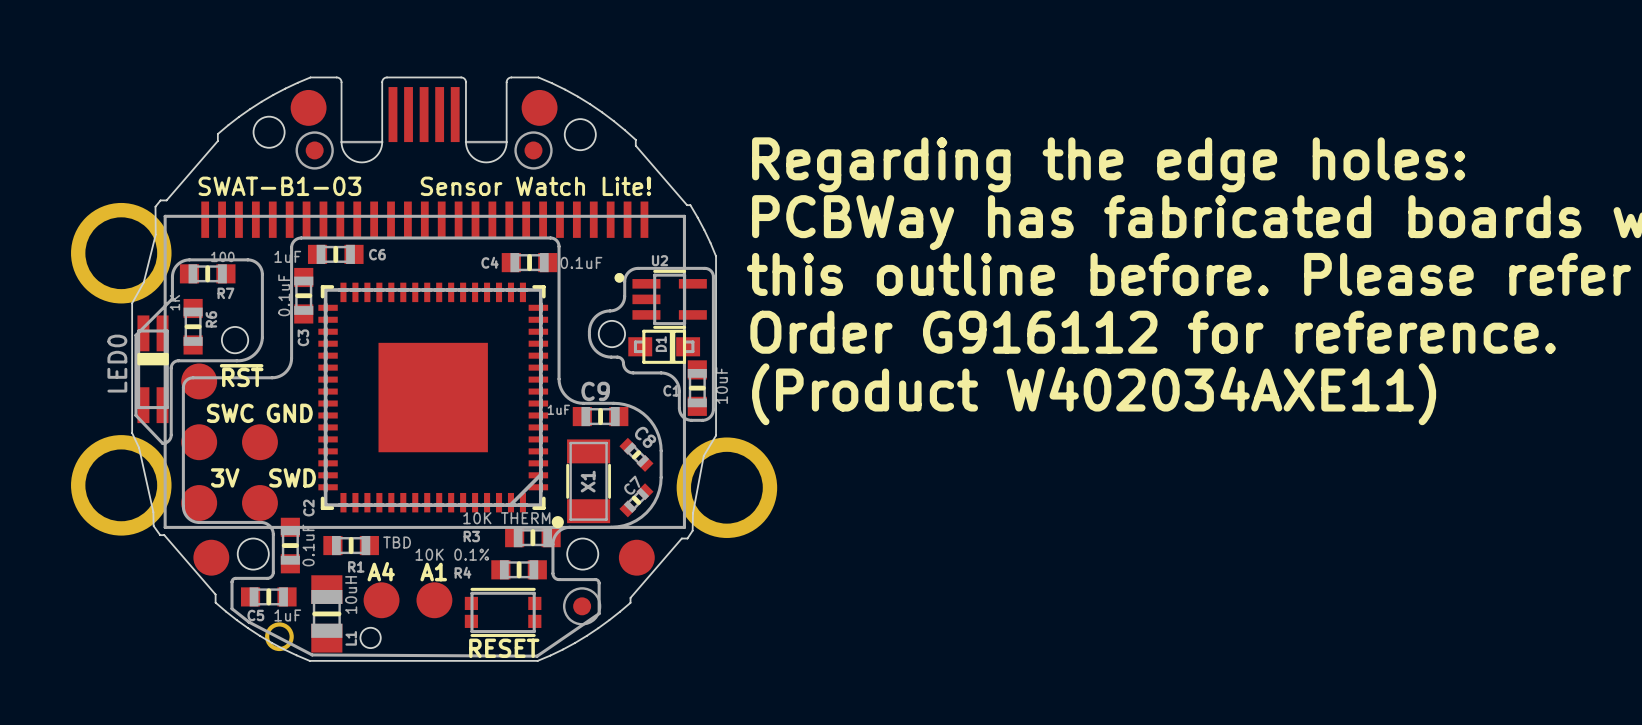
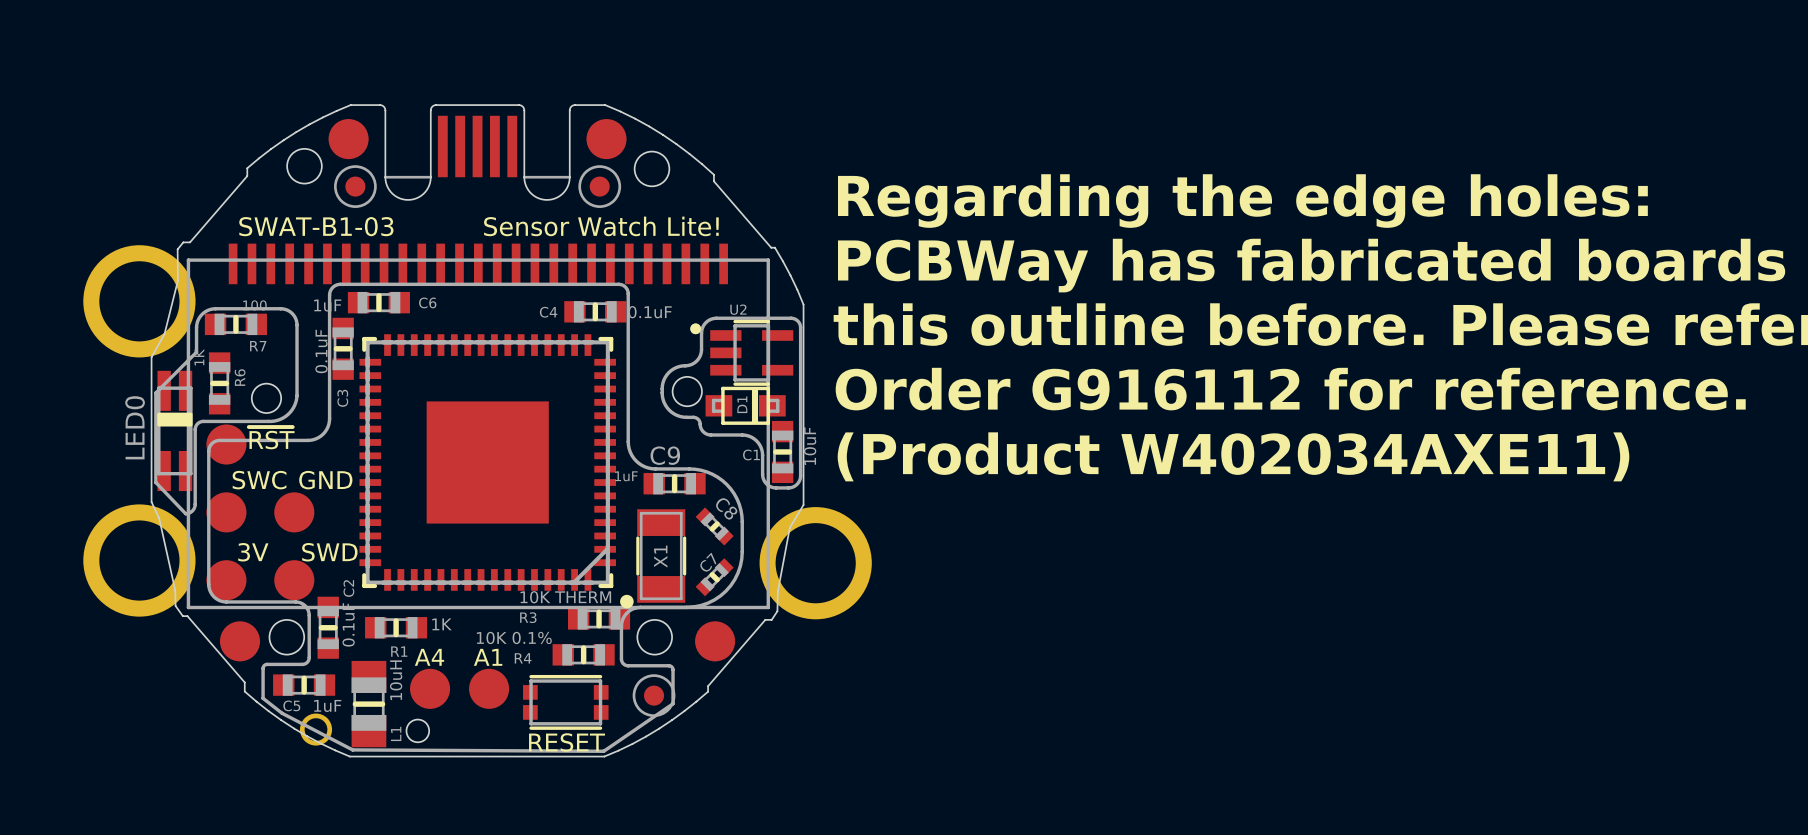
R1 value: TBD (397, 542) -> 1K (442, 624)

